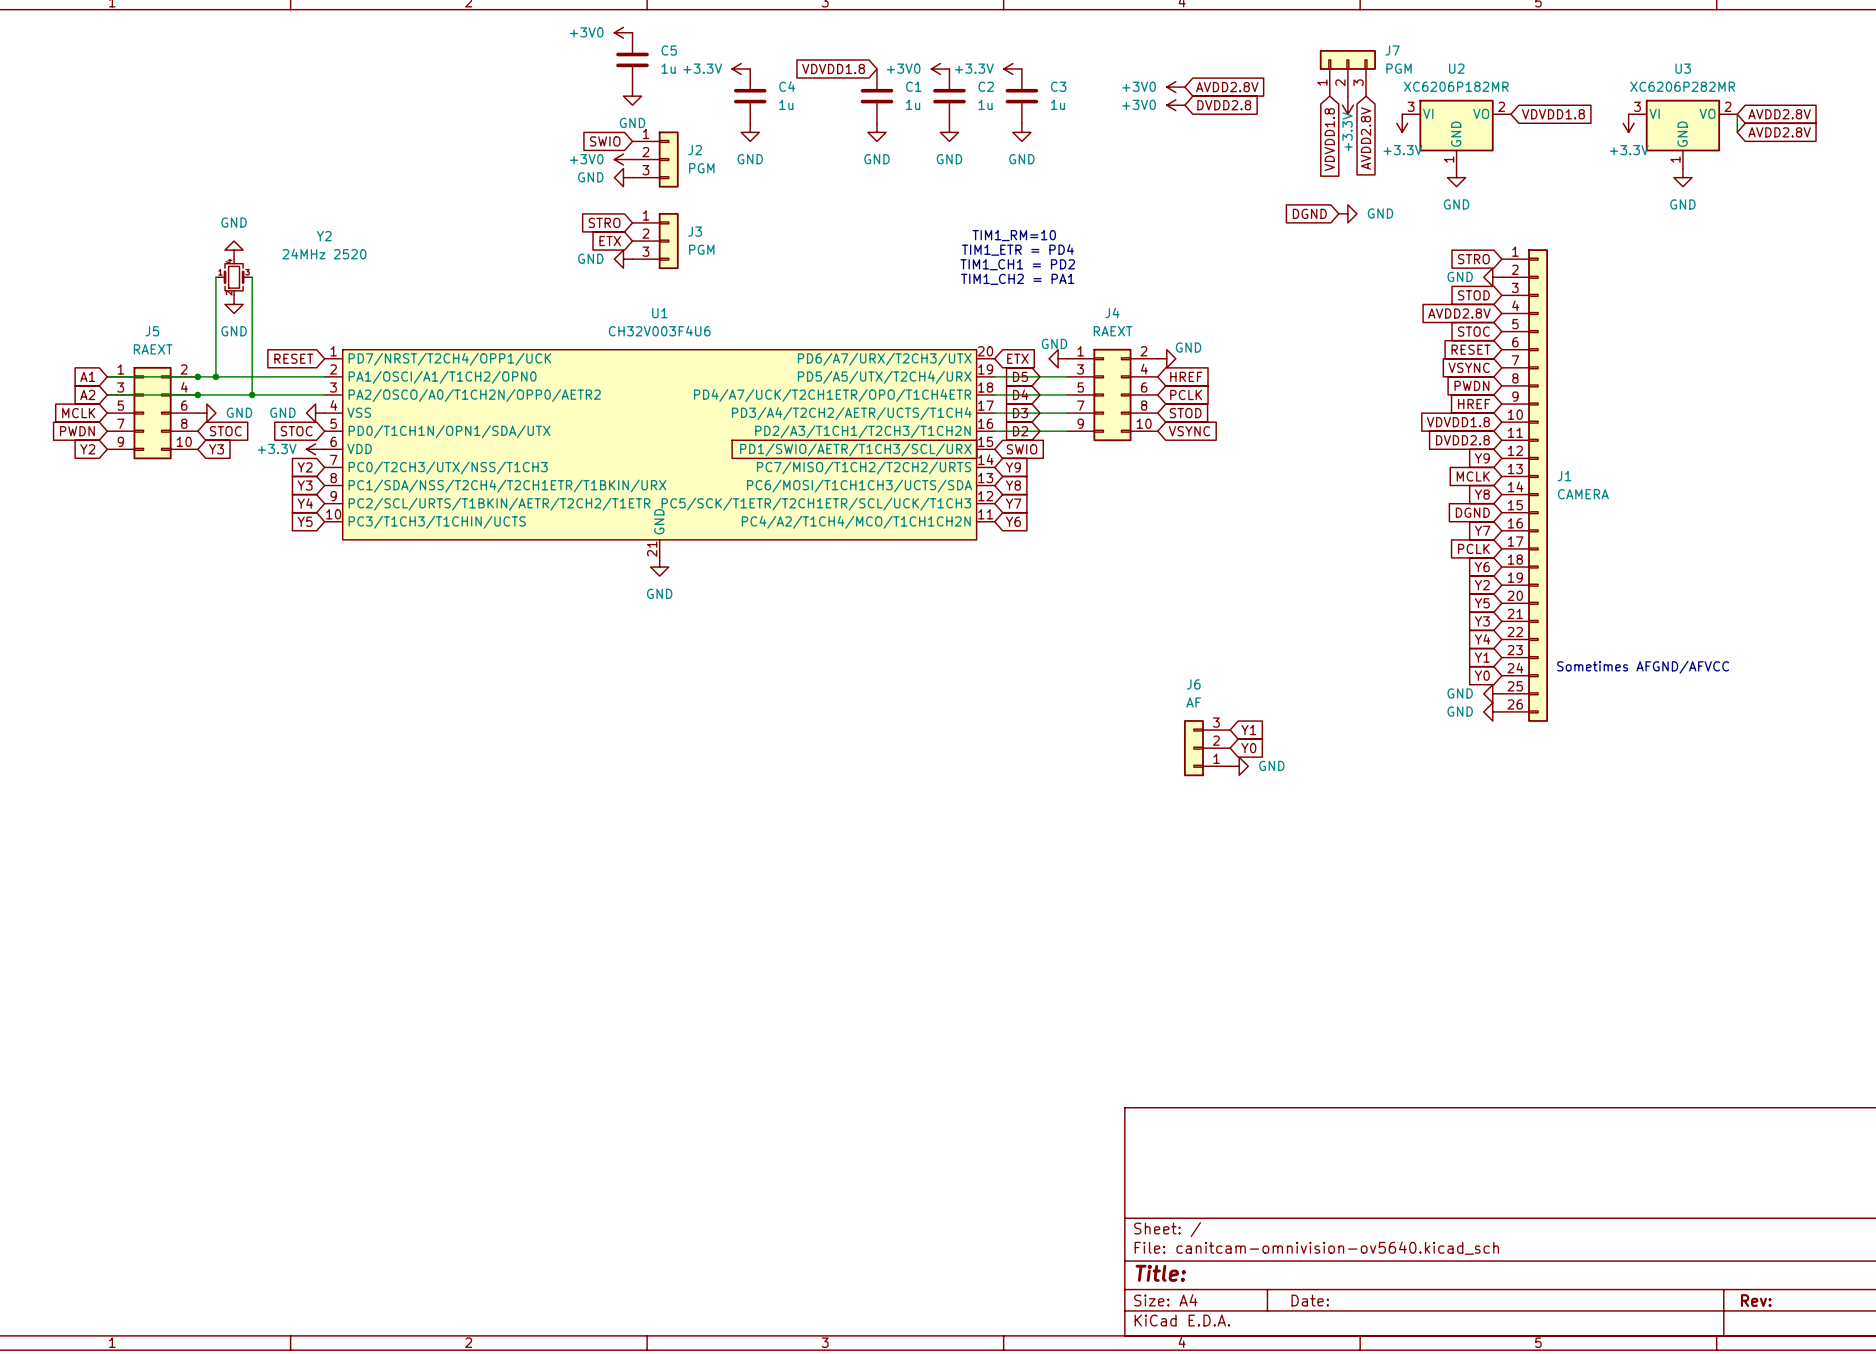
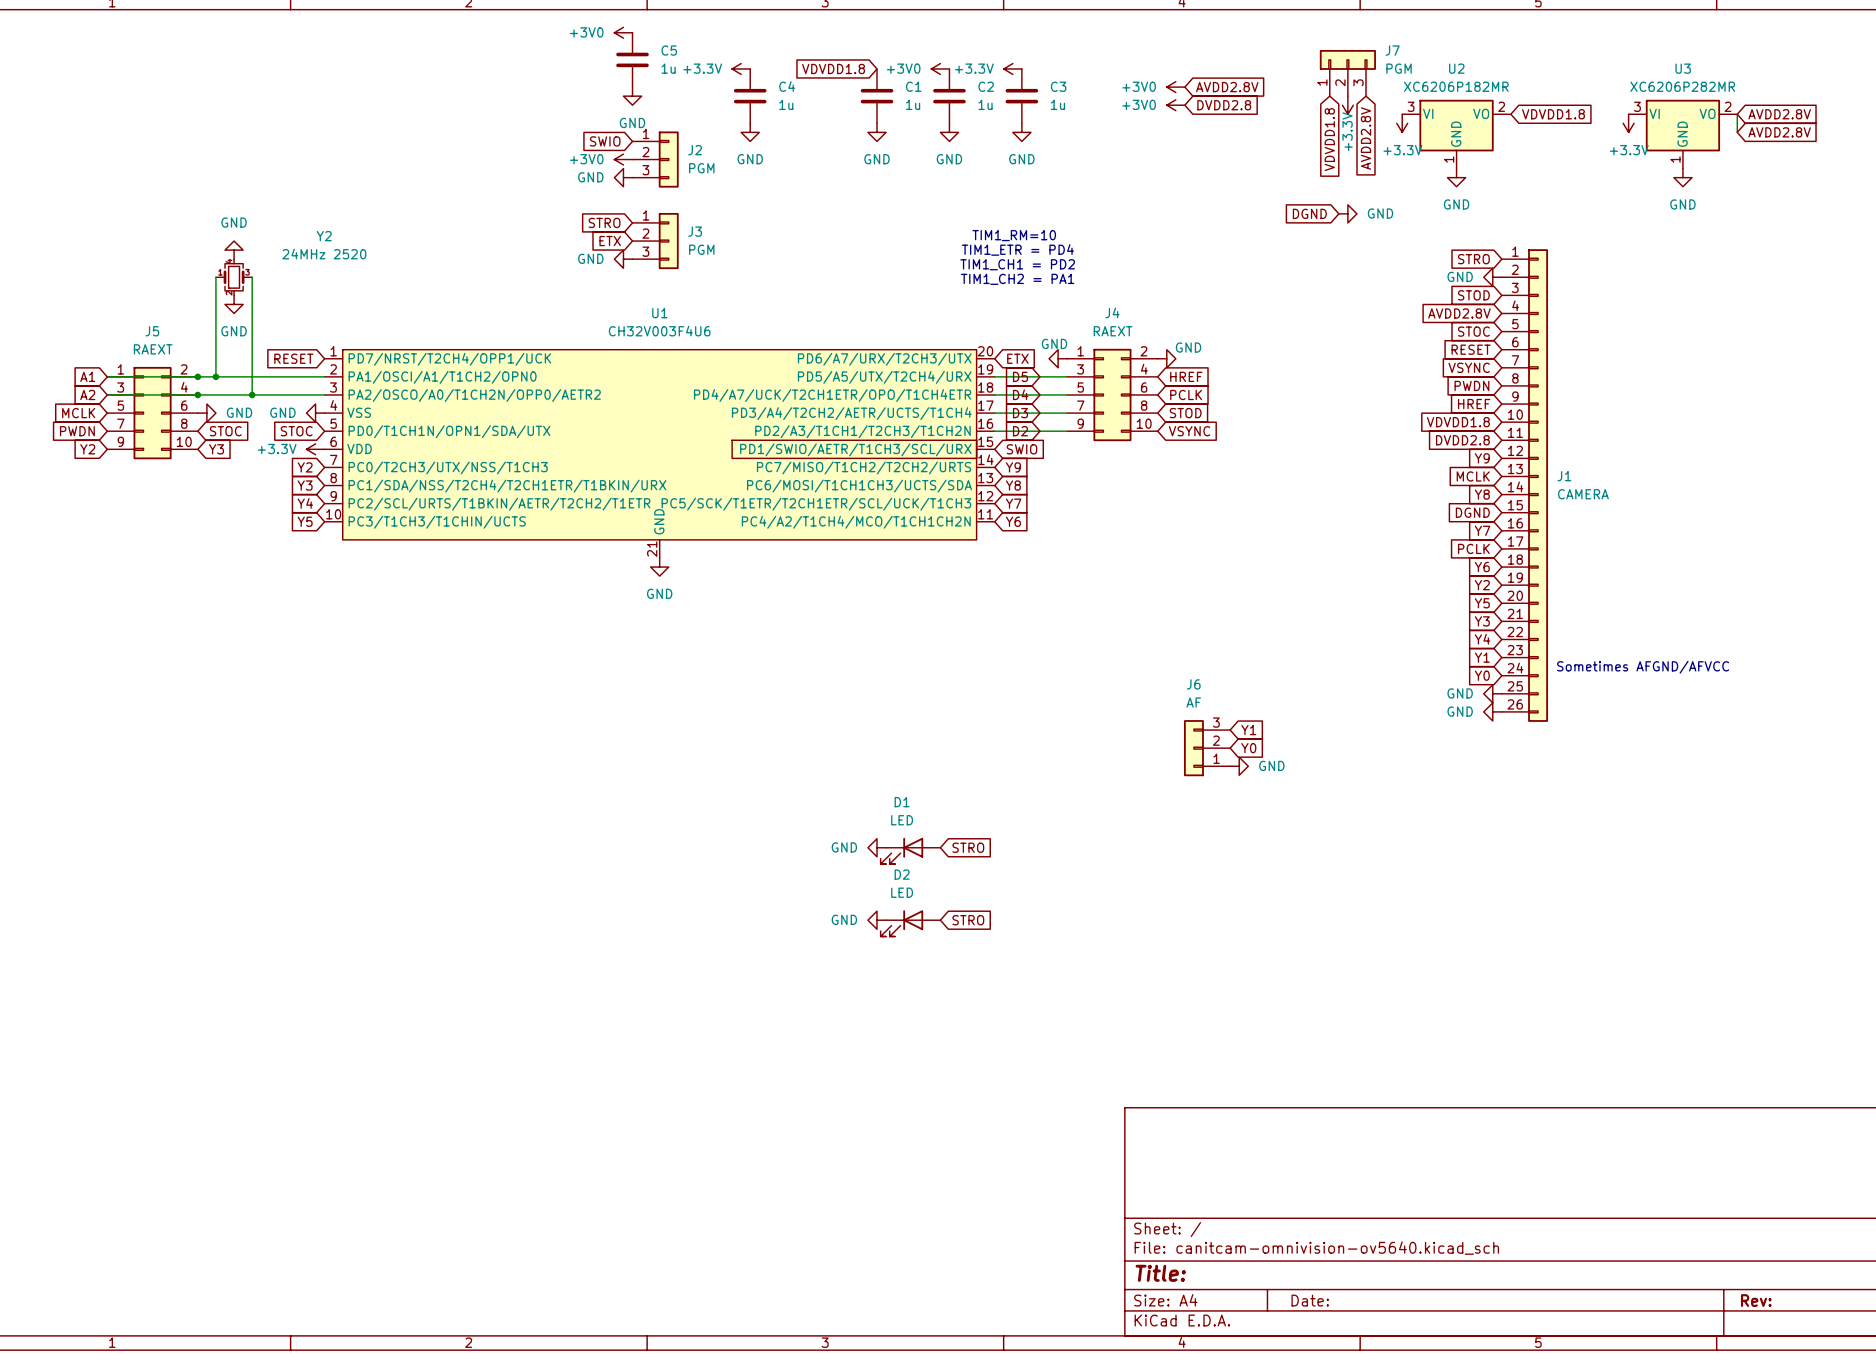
power symbol: none -> GND (877, 847)
global label: none -> STRO (968, 847)
D1: none -> LED (910, 850)
power symbol: none -> GND (877, 920)
global label: none -> STRO (968, 920)
D2: none -> LED (910, 923)

